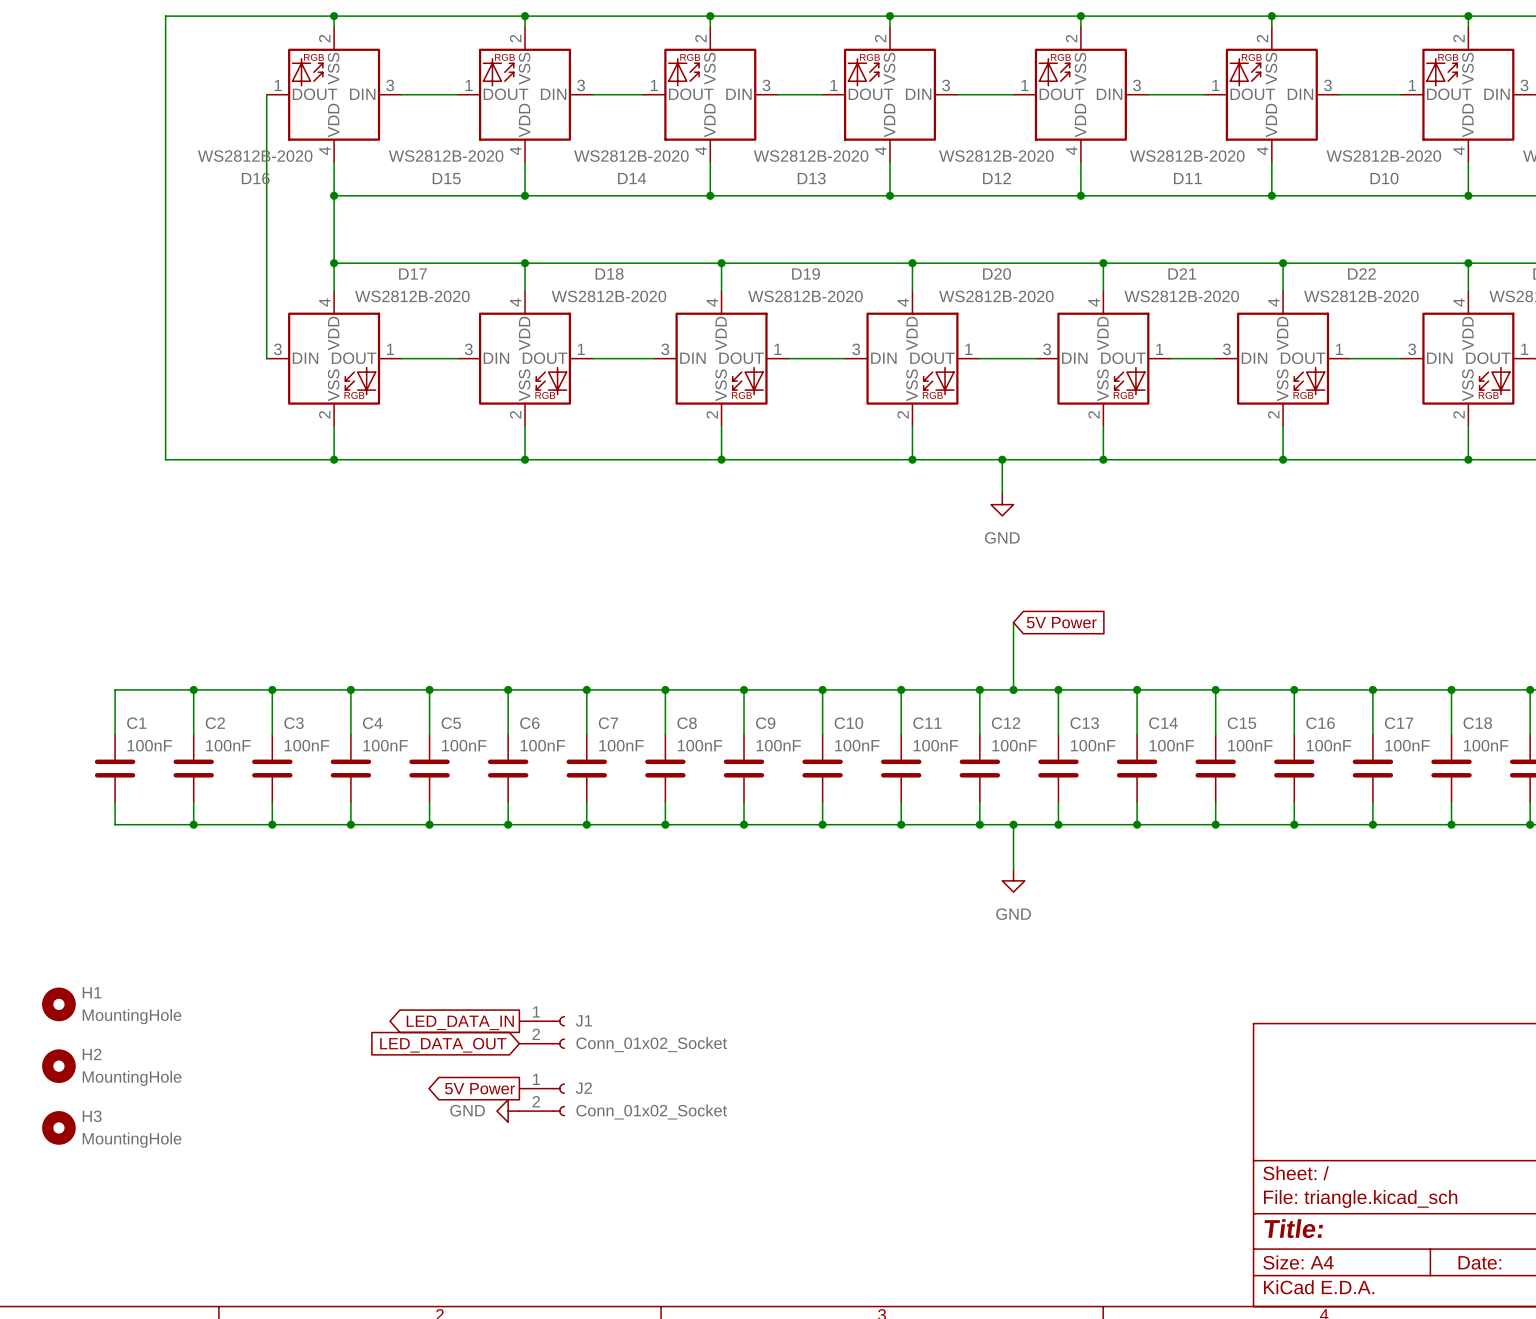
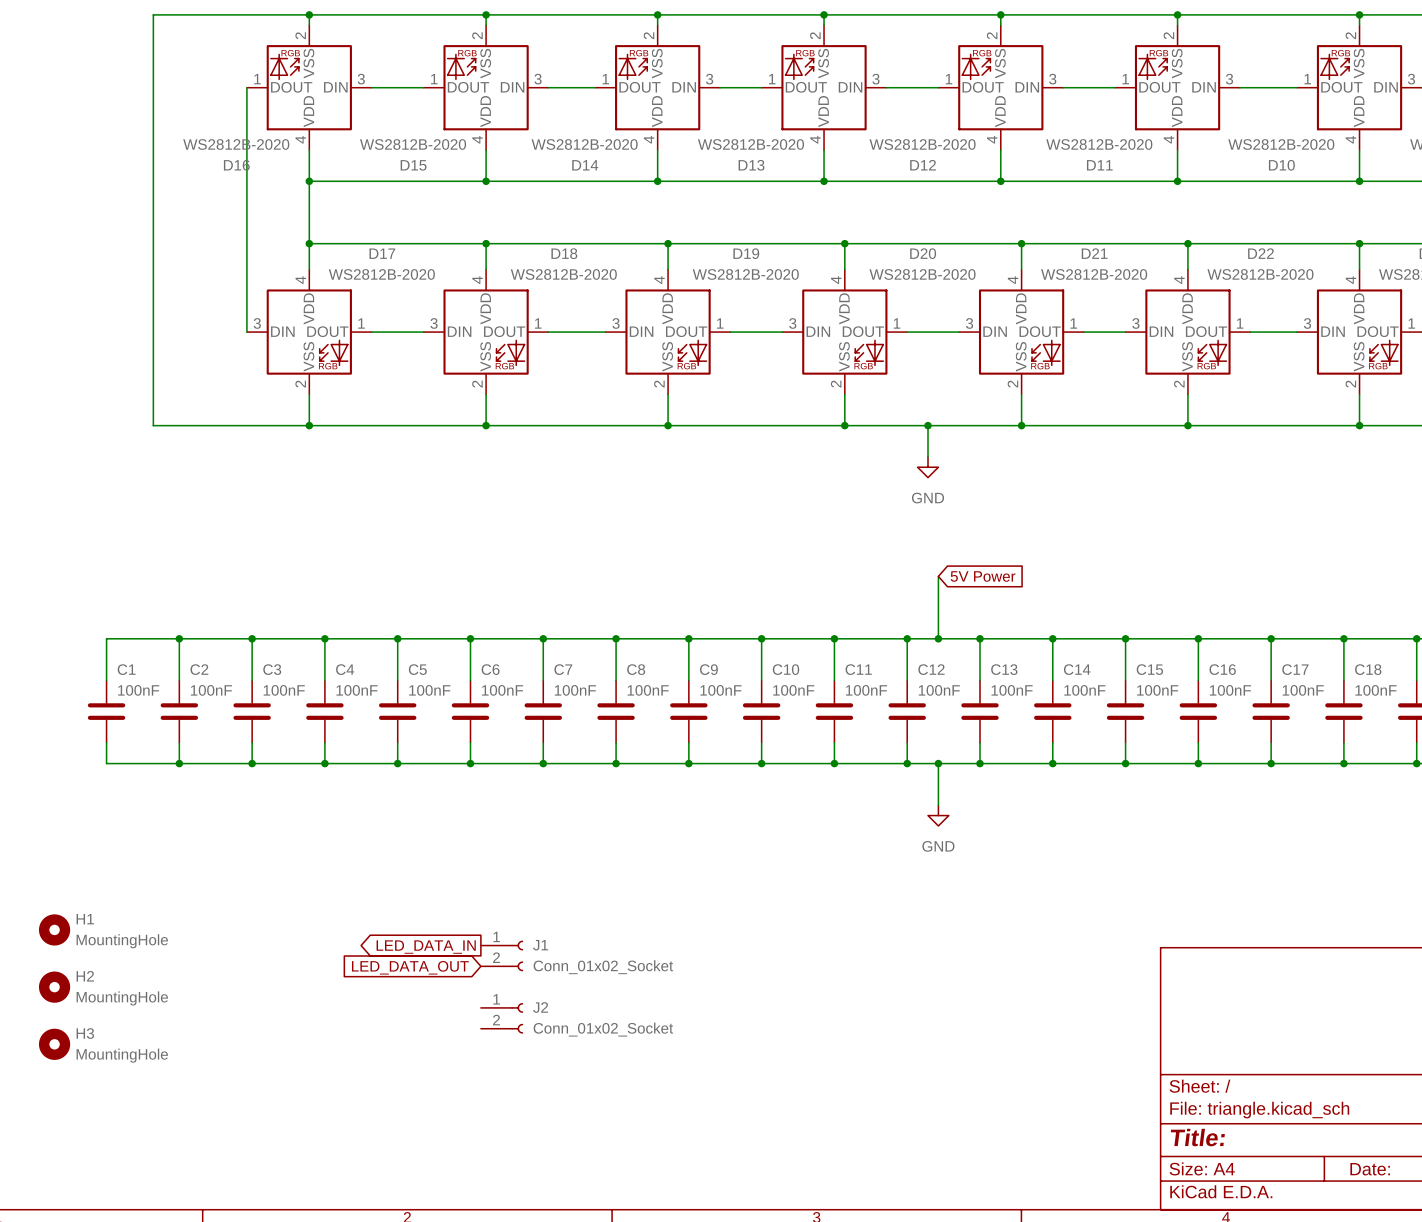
global label: 5V Power (479, 1088) -> none
power symbol: GND (508, 1111) -> none

